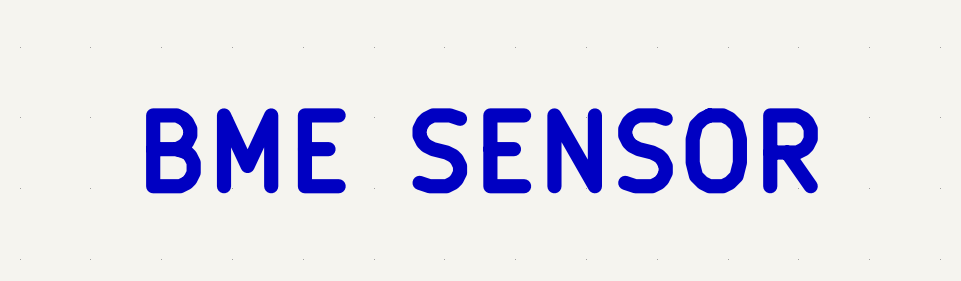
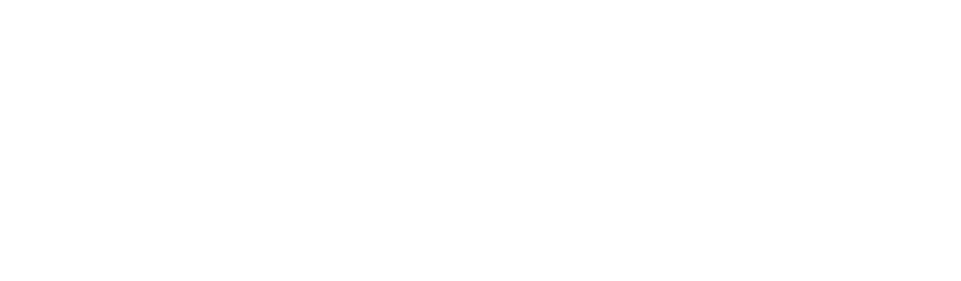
text: BME SENSOR (481, 150) -> none

